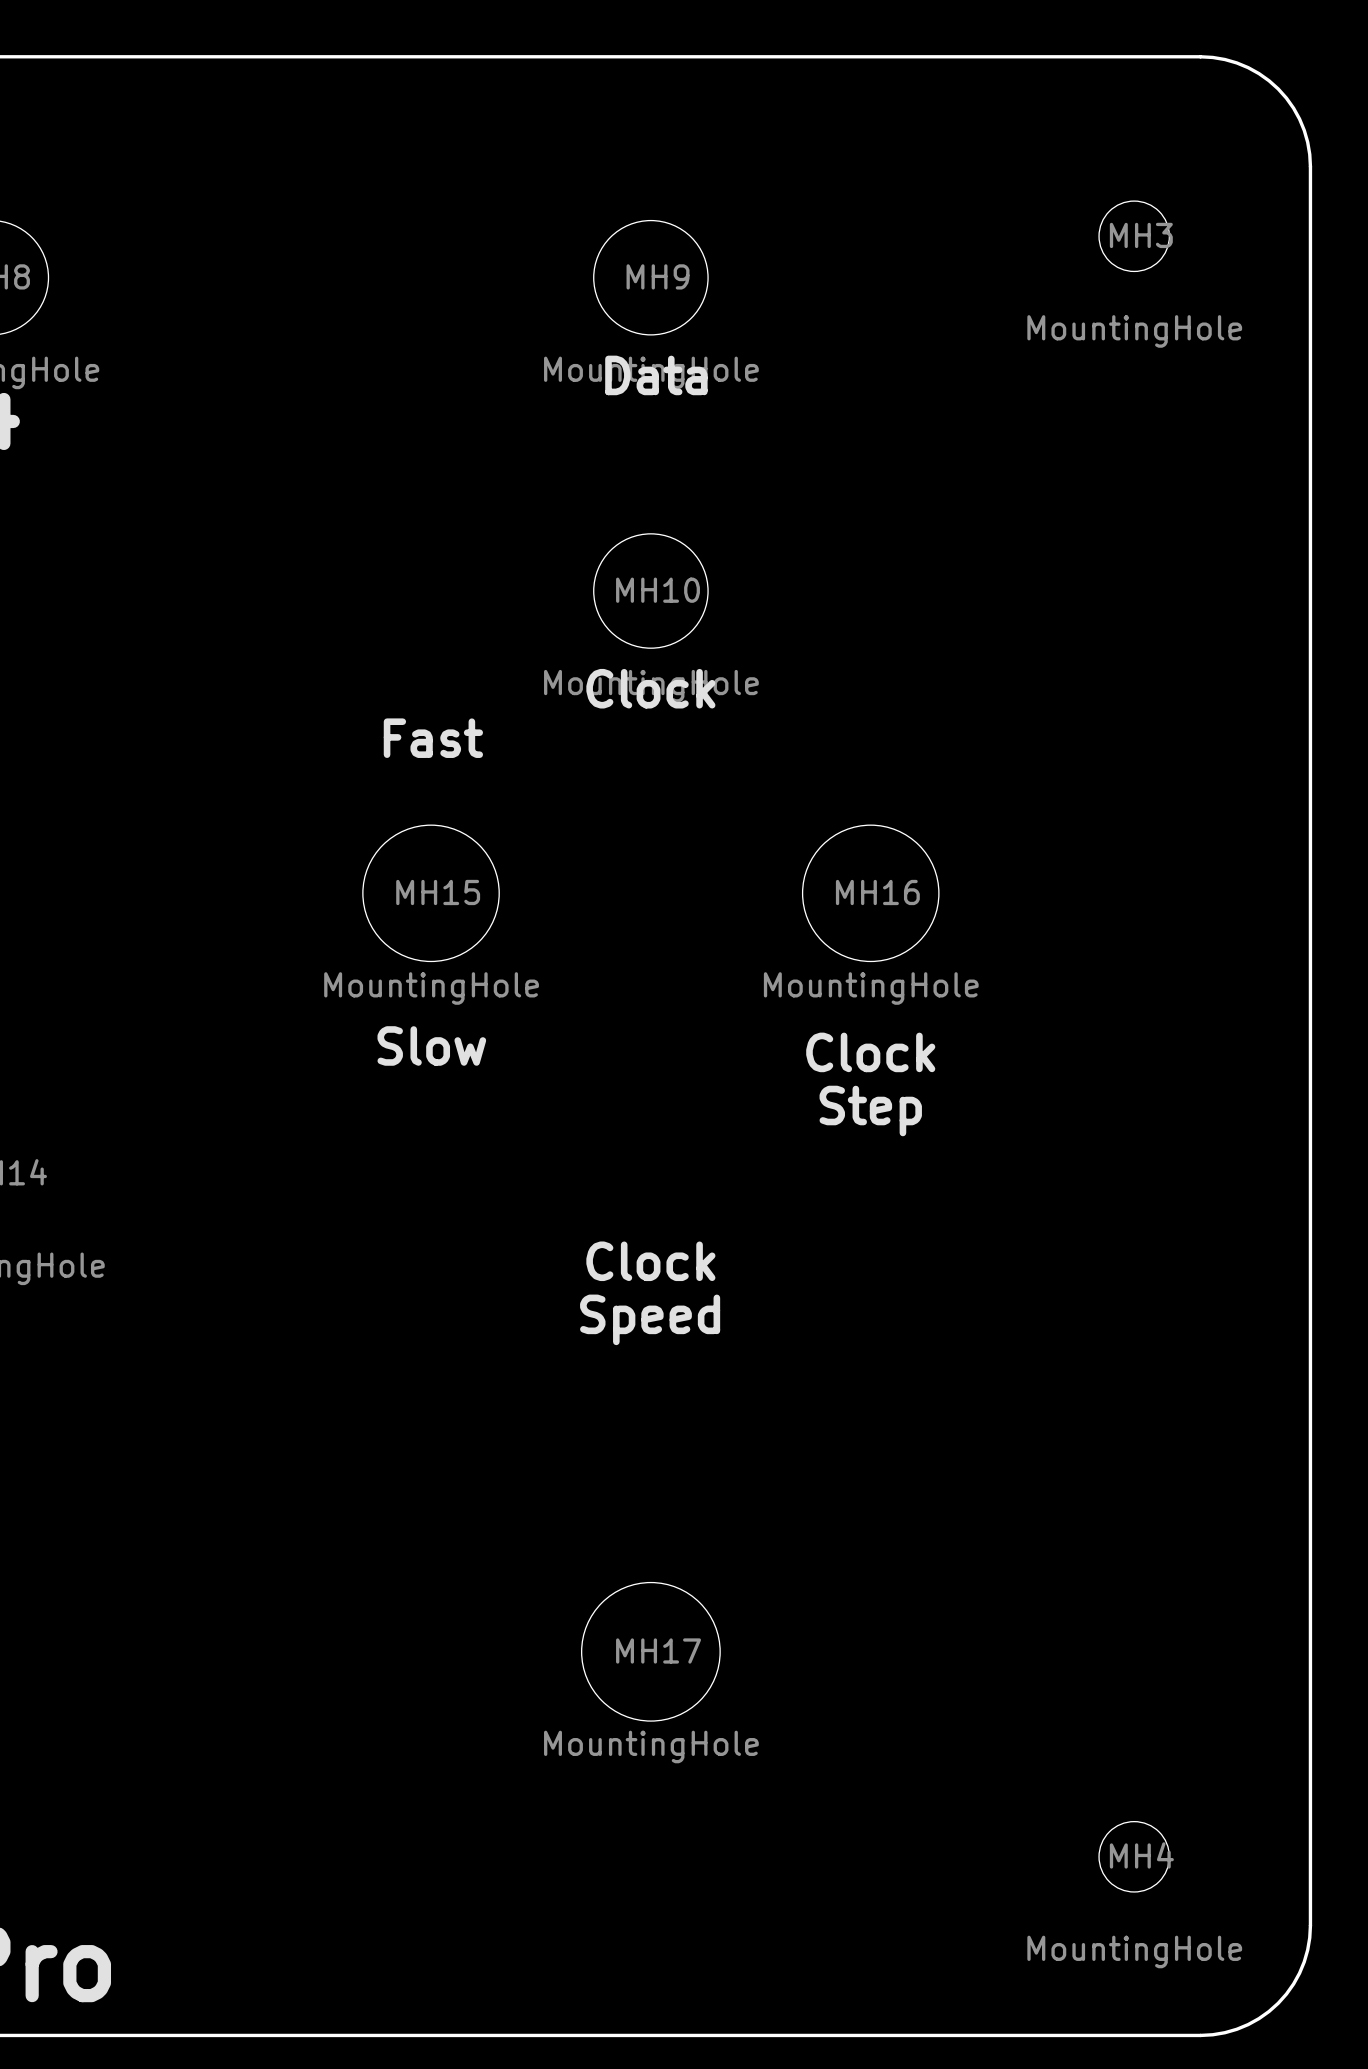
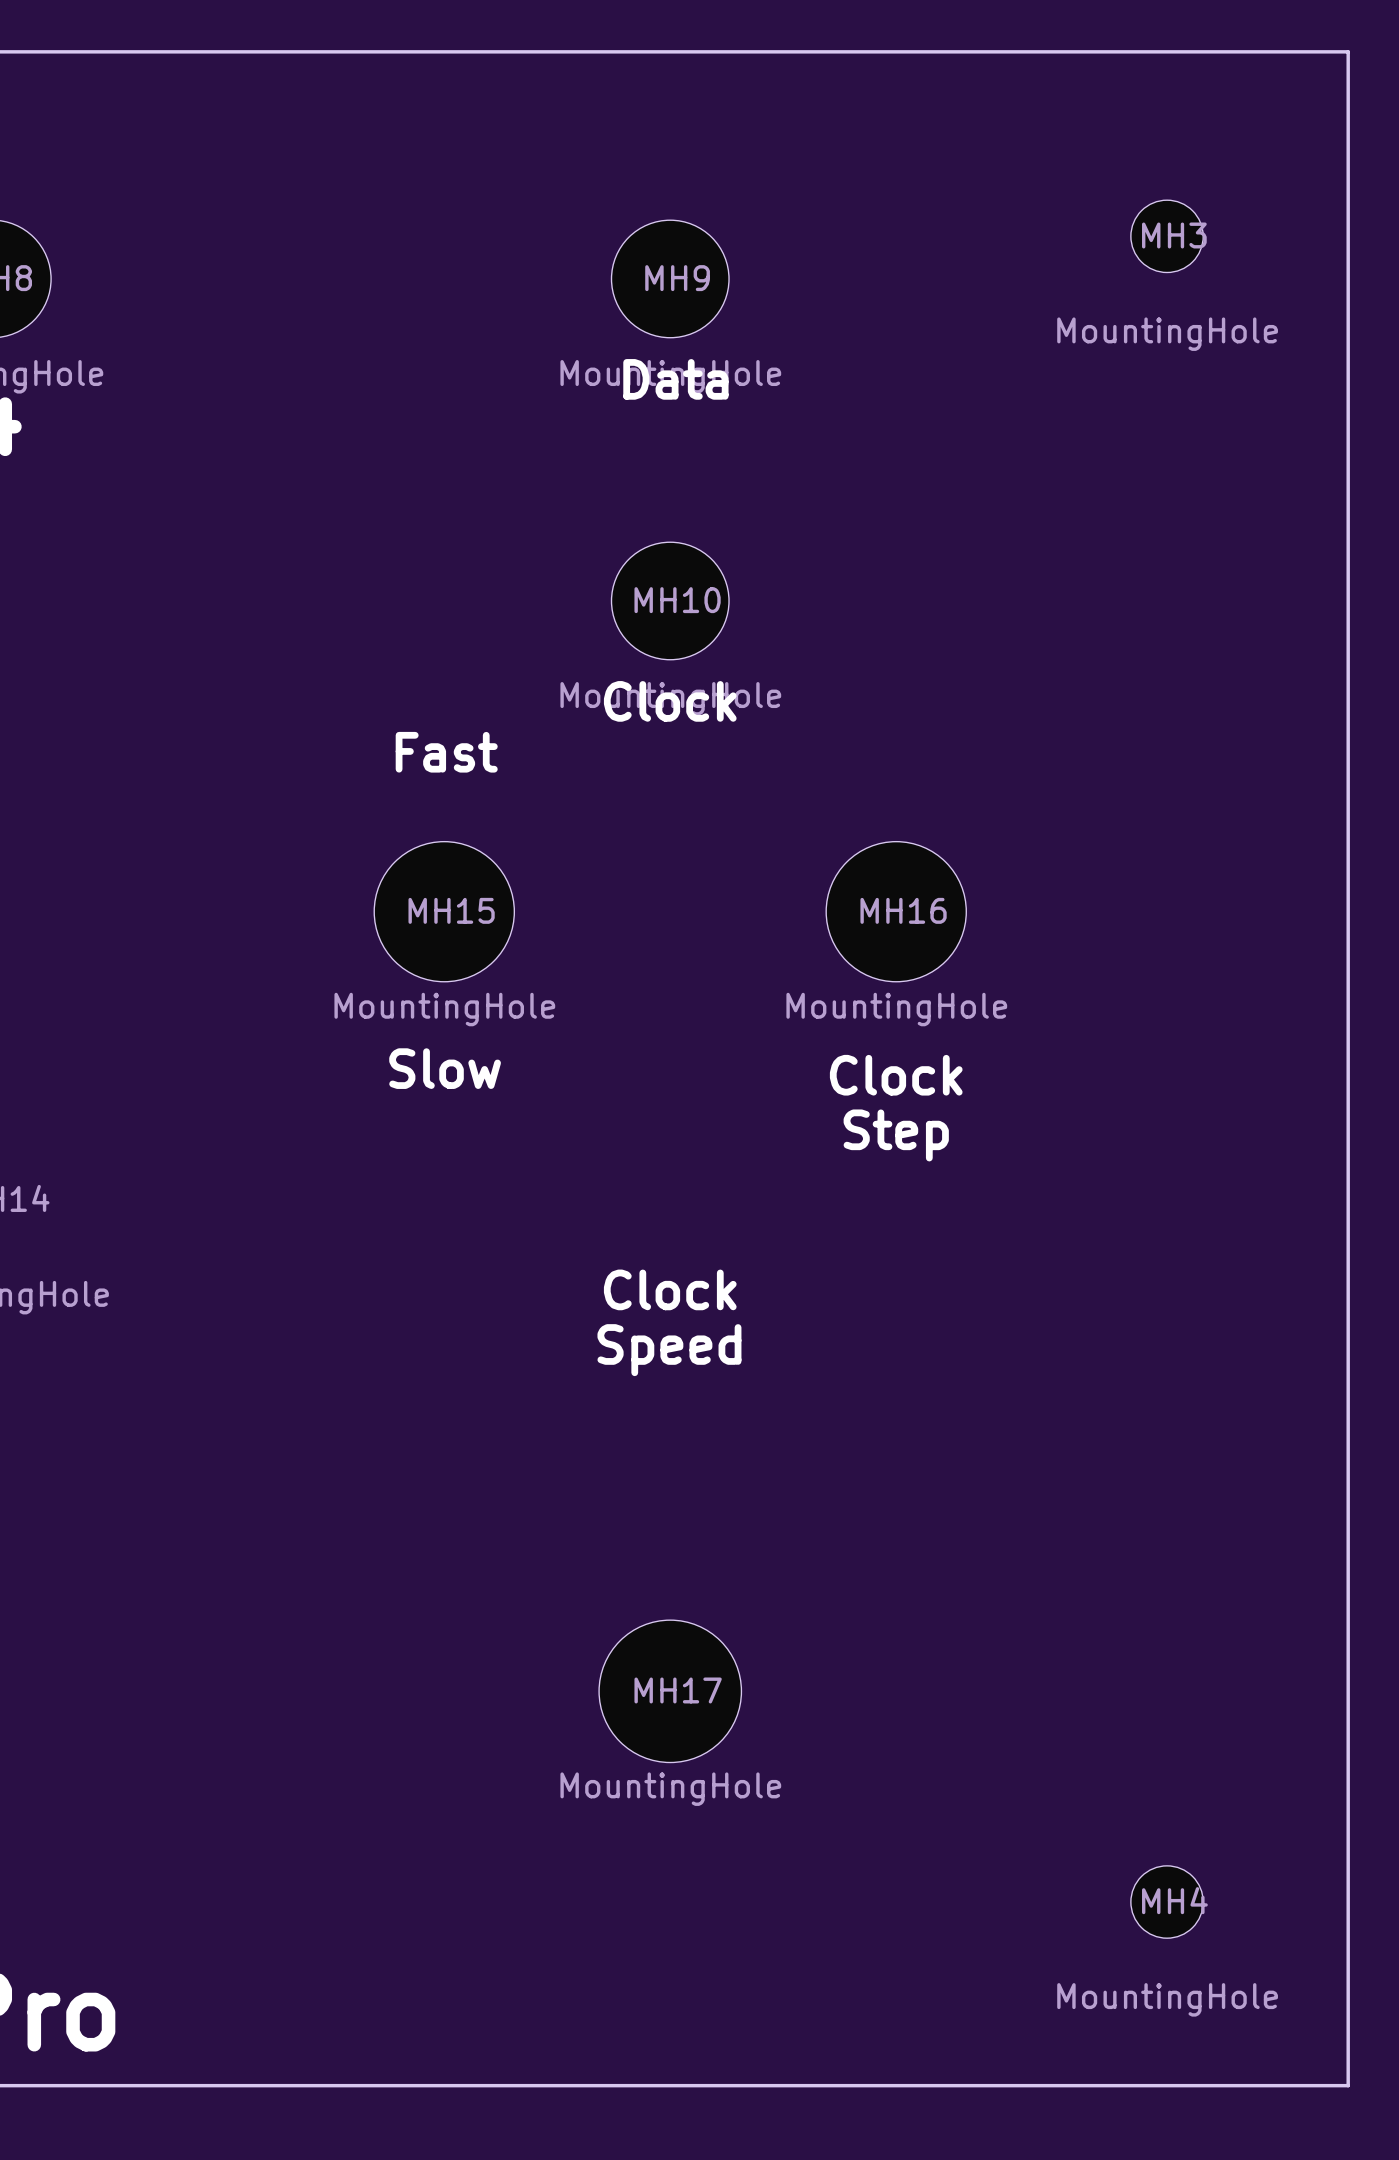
board edge: (1200, 56) (1236, 62) (1259, 73) (1278, 88) (1293, 108) (1304, 130) (1310, 166) -> (1235, 51) (1348, 51) (1348, 164)
board edge: (1310, 1925) (1304, 1961) (1293, 1984) (1278, 2003) (1259, 2018) (1236, 2029) (1200, 2035) -> (1348, 1972) (1348, 2085) (1235, 2085)

